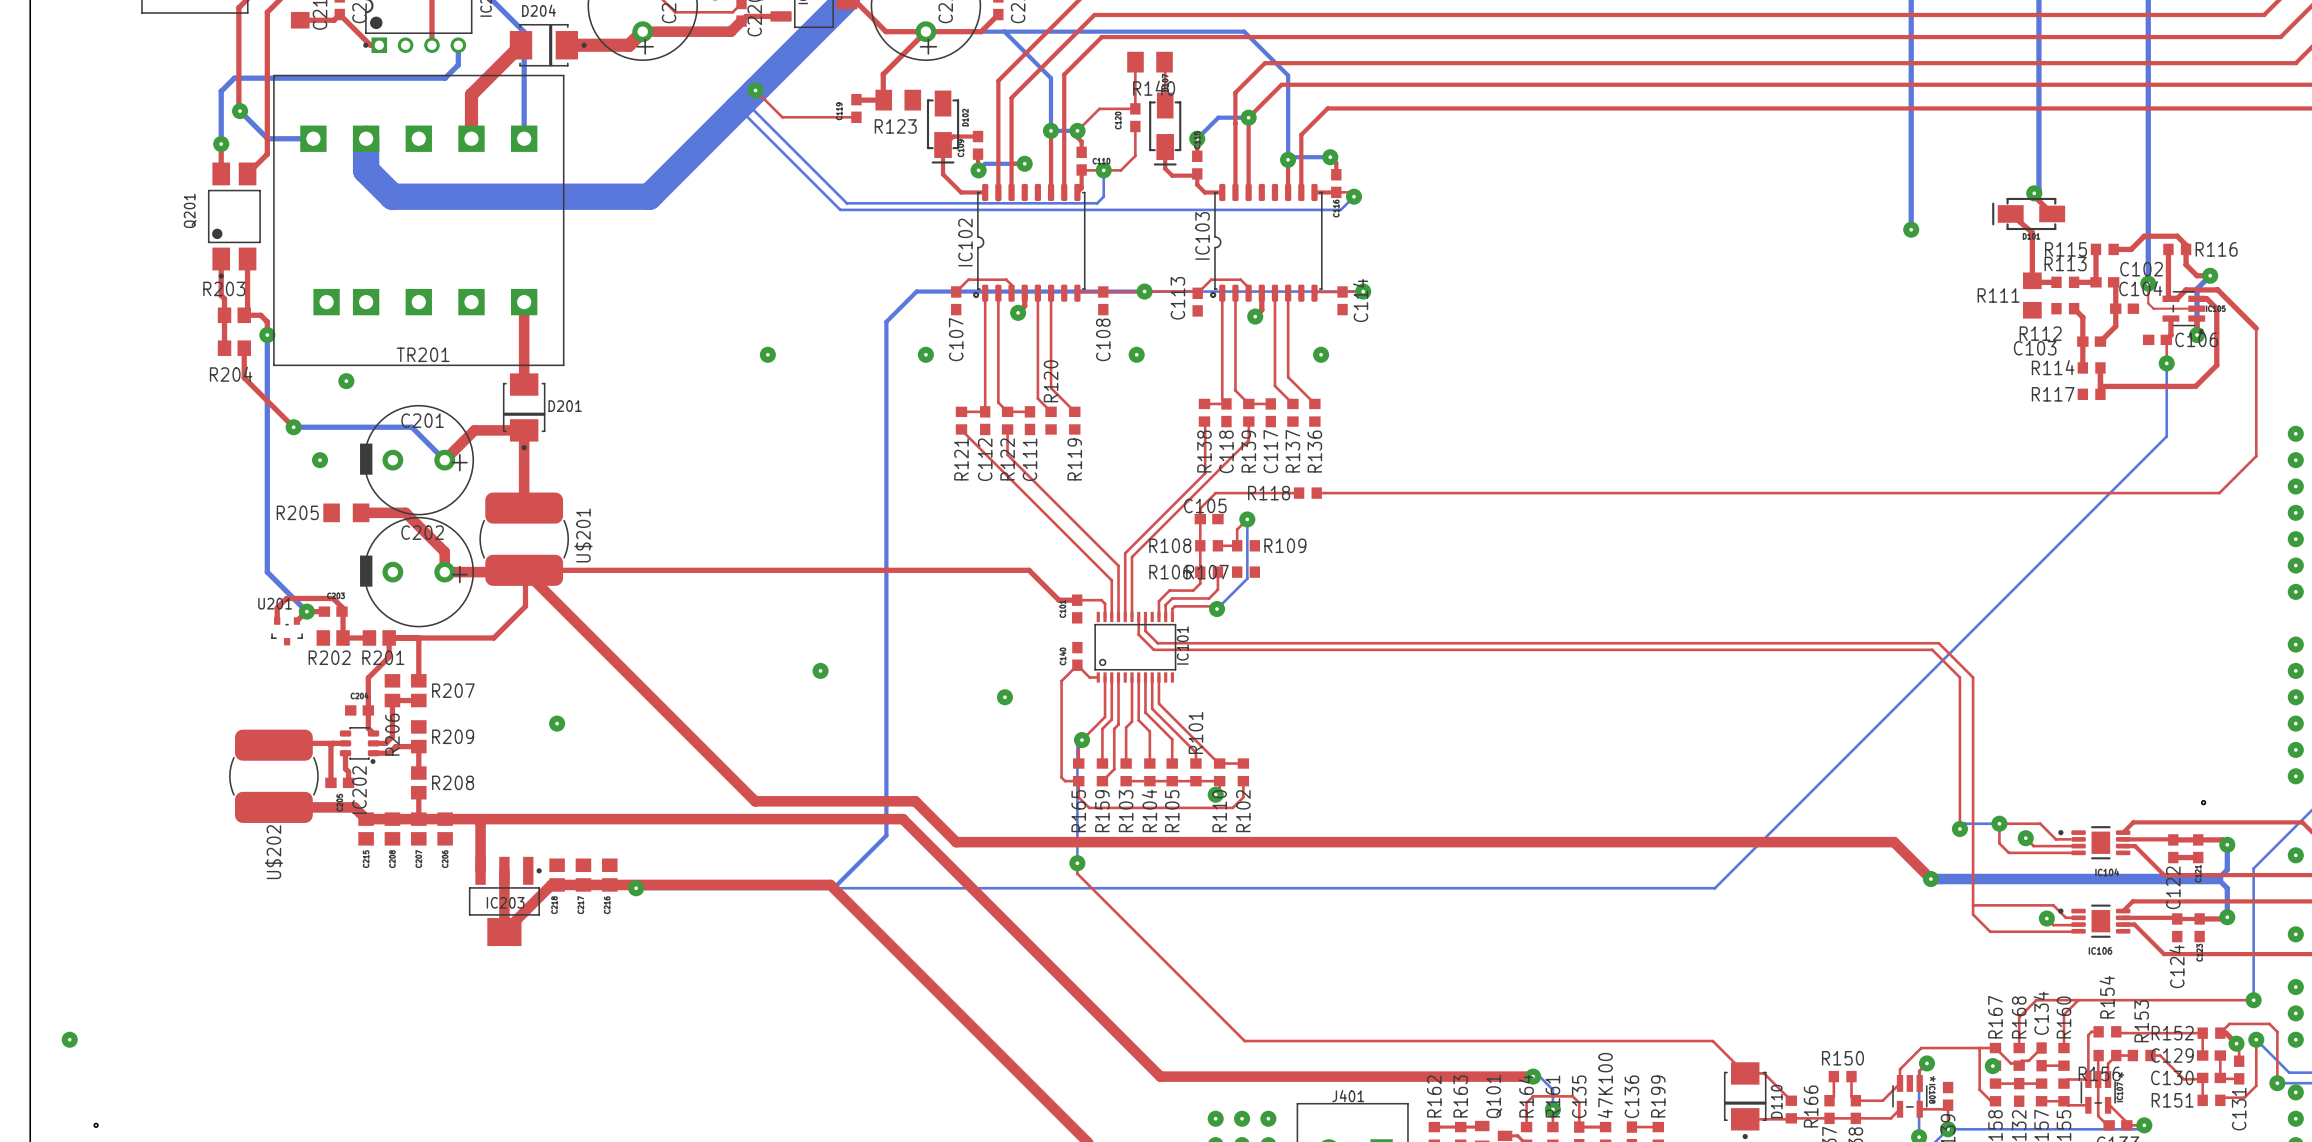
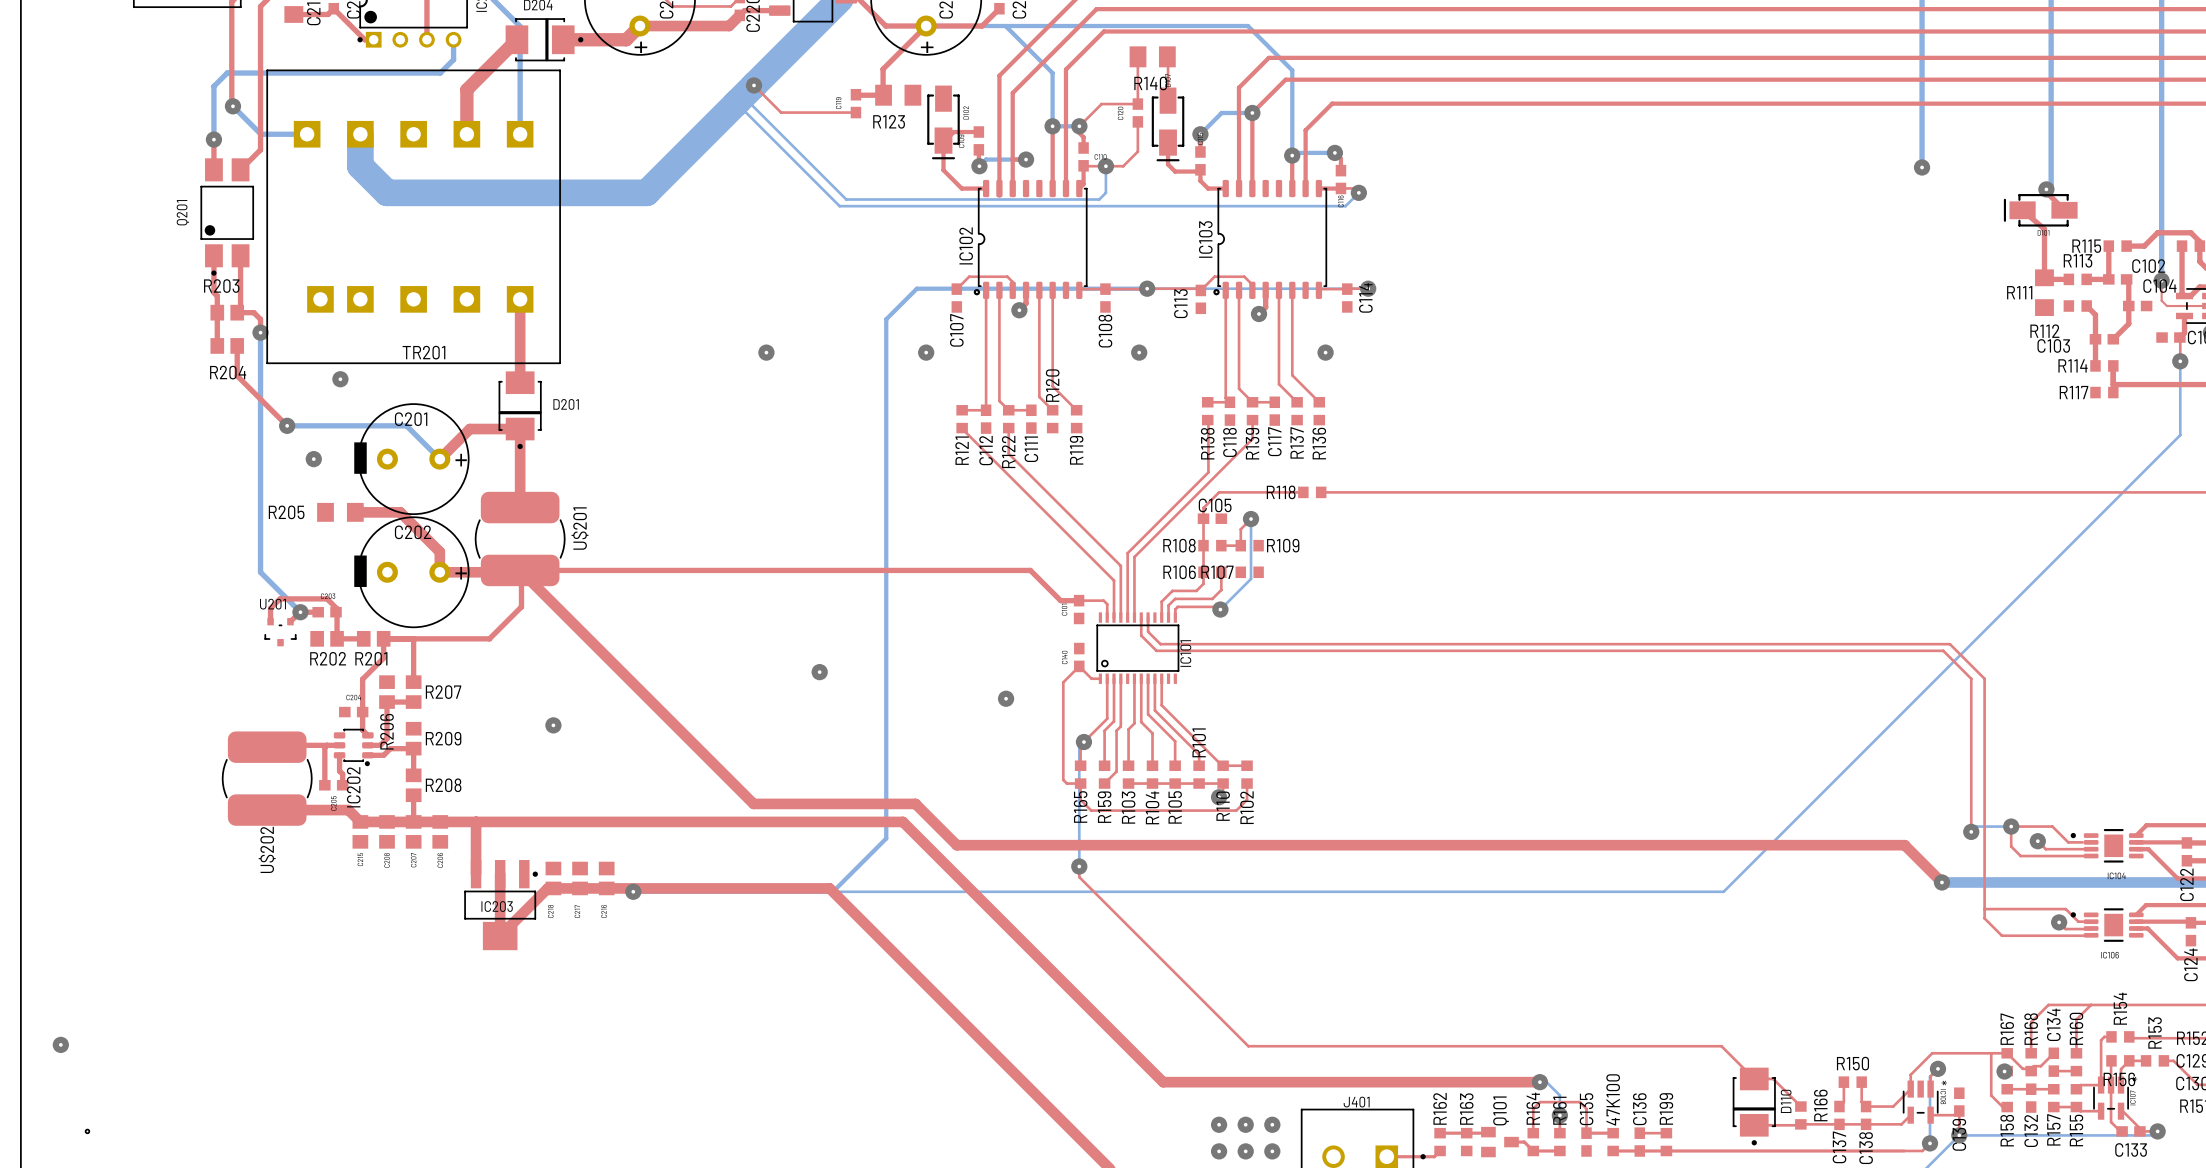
bottom track: (1911, 171) (1911, 229) -> none
via position: (1911, 229) -> (1922, 167)

